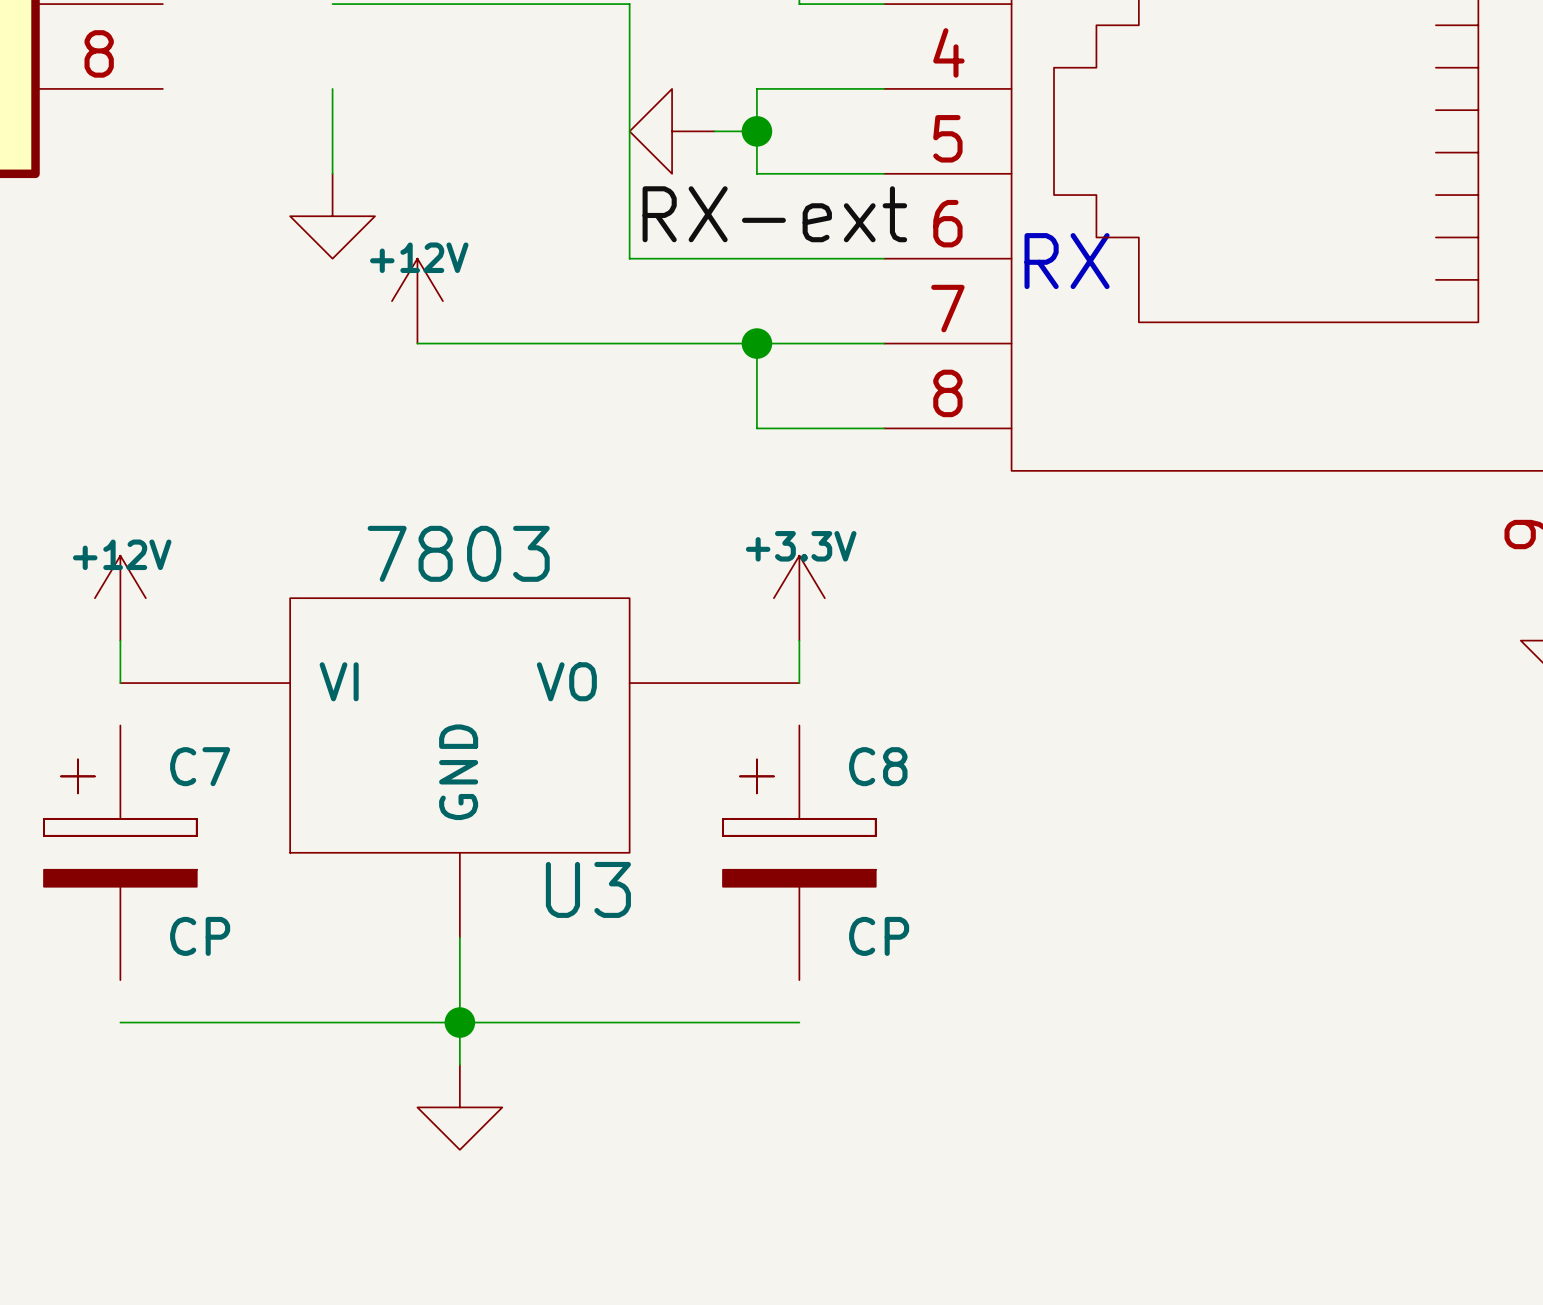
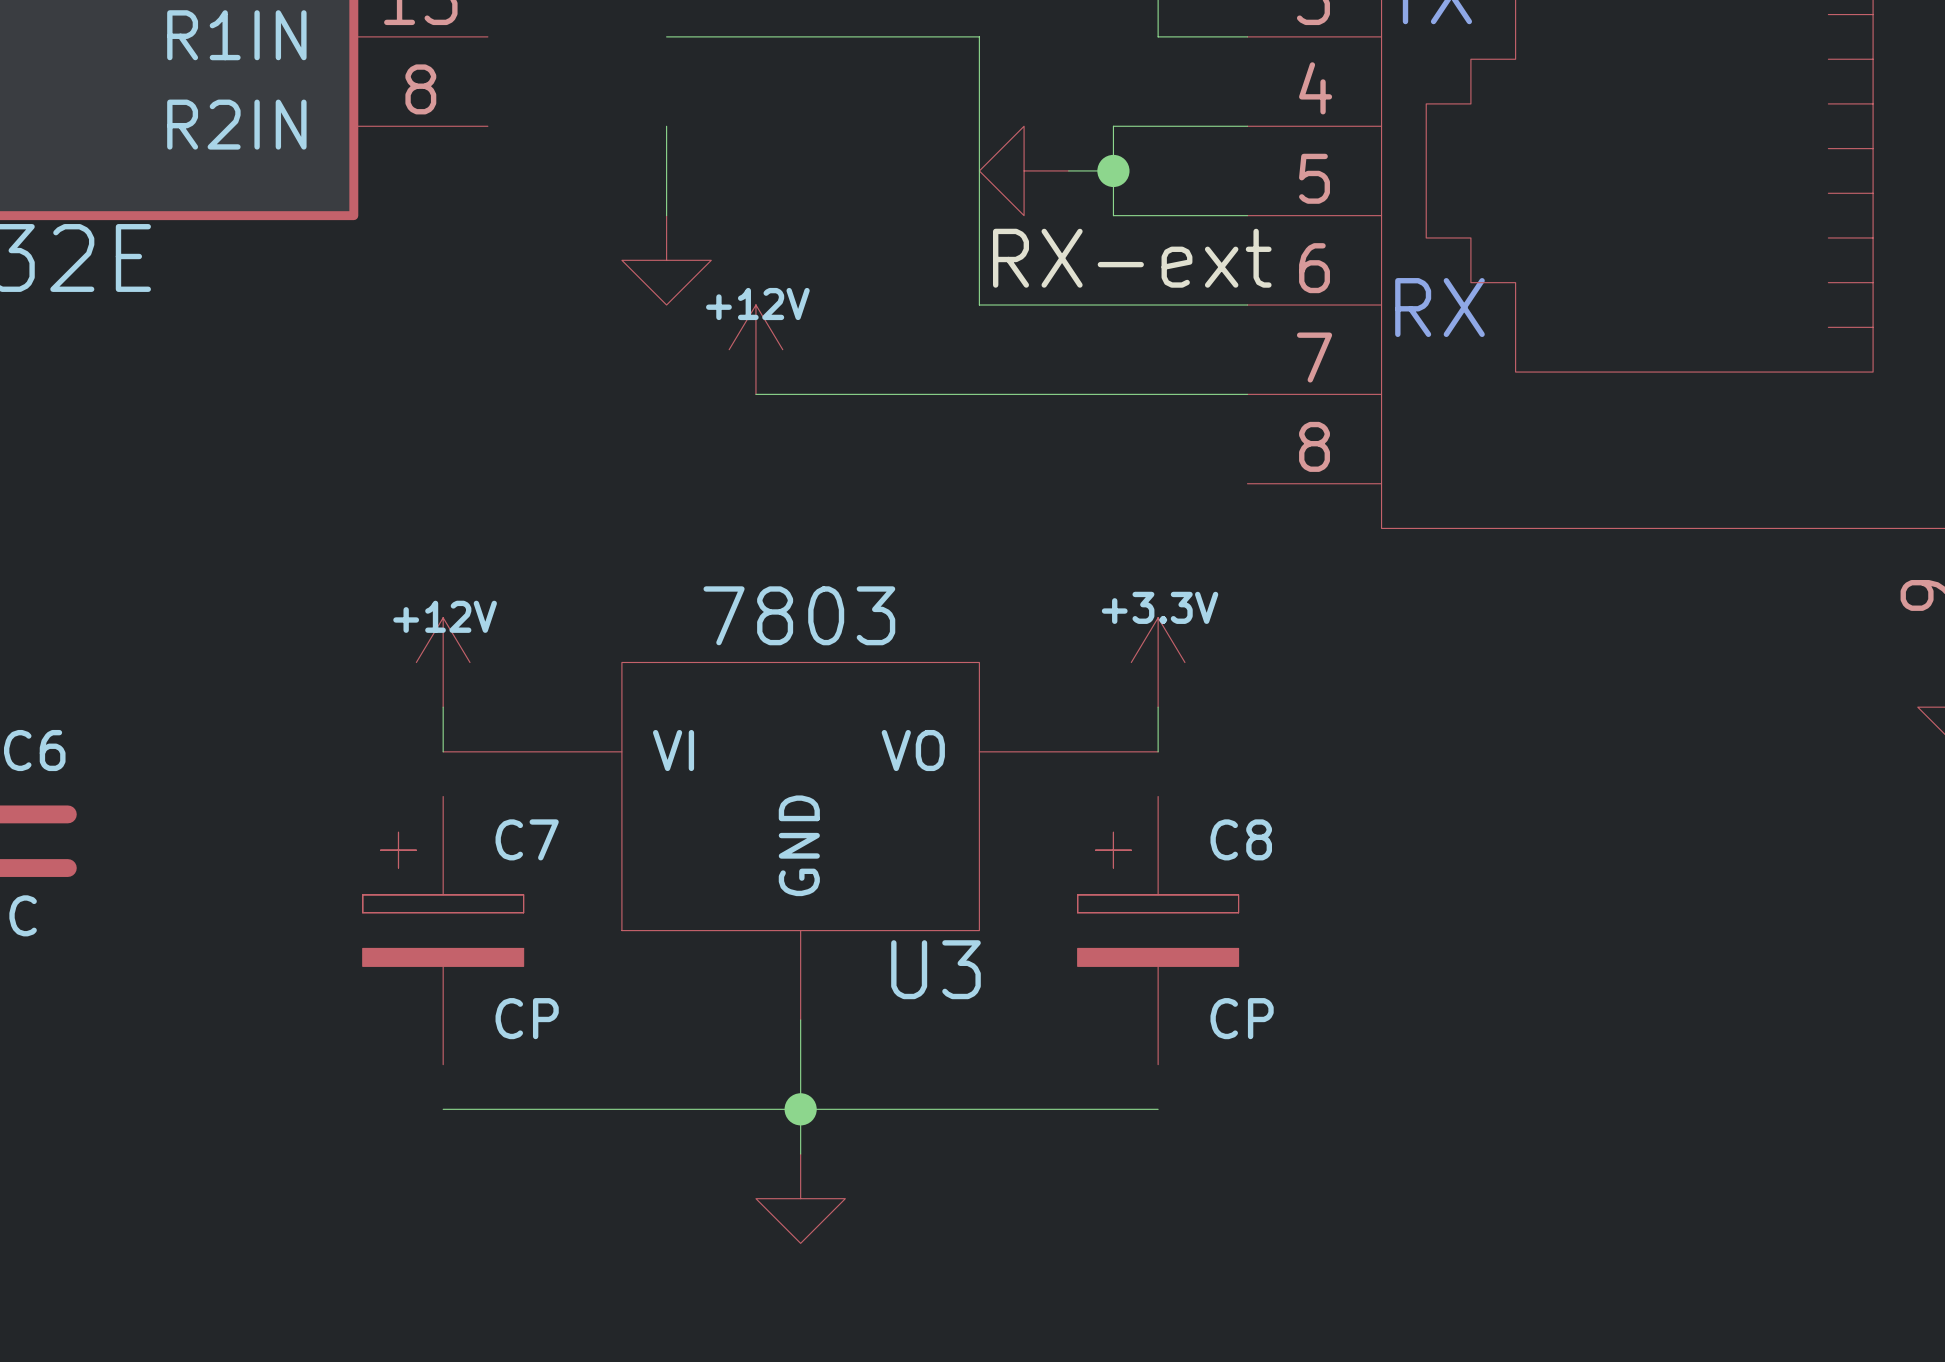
wire: (756, 343) (756, 428) (884, 428) -> none
junction: (756, 343) -> none

